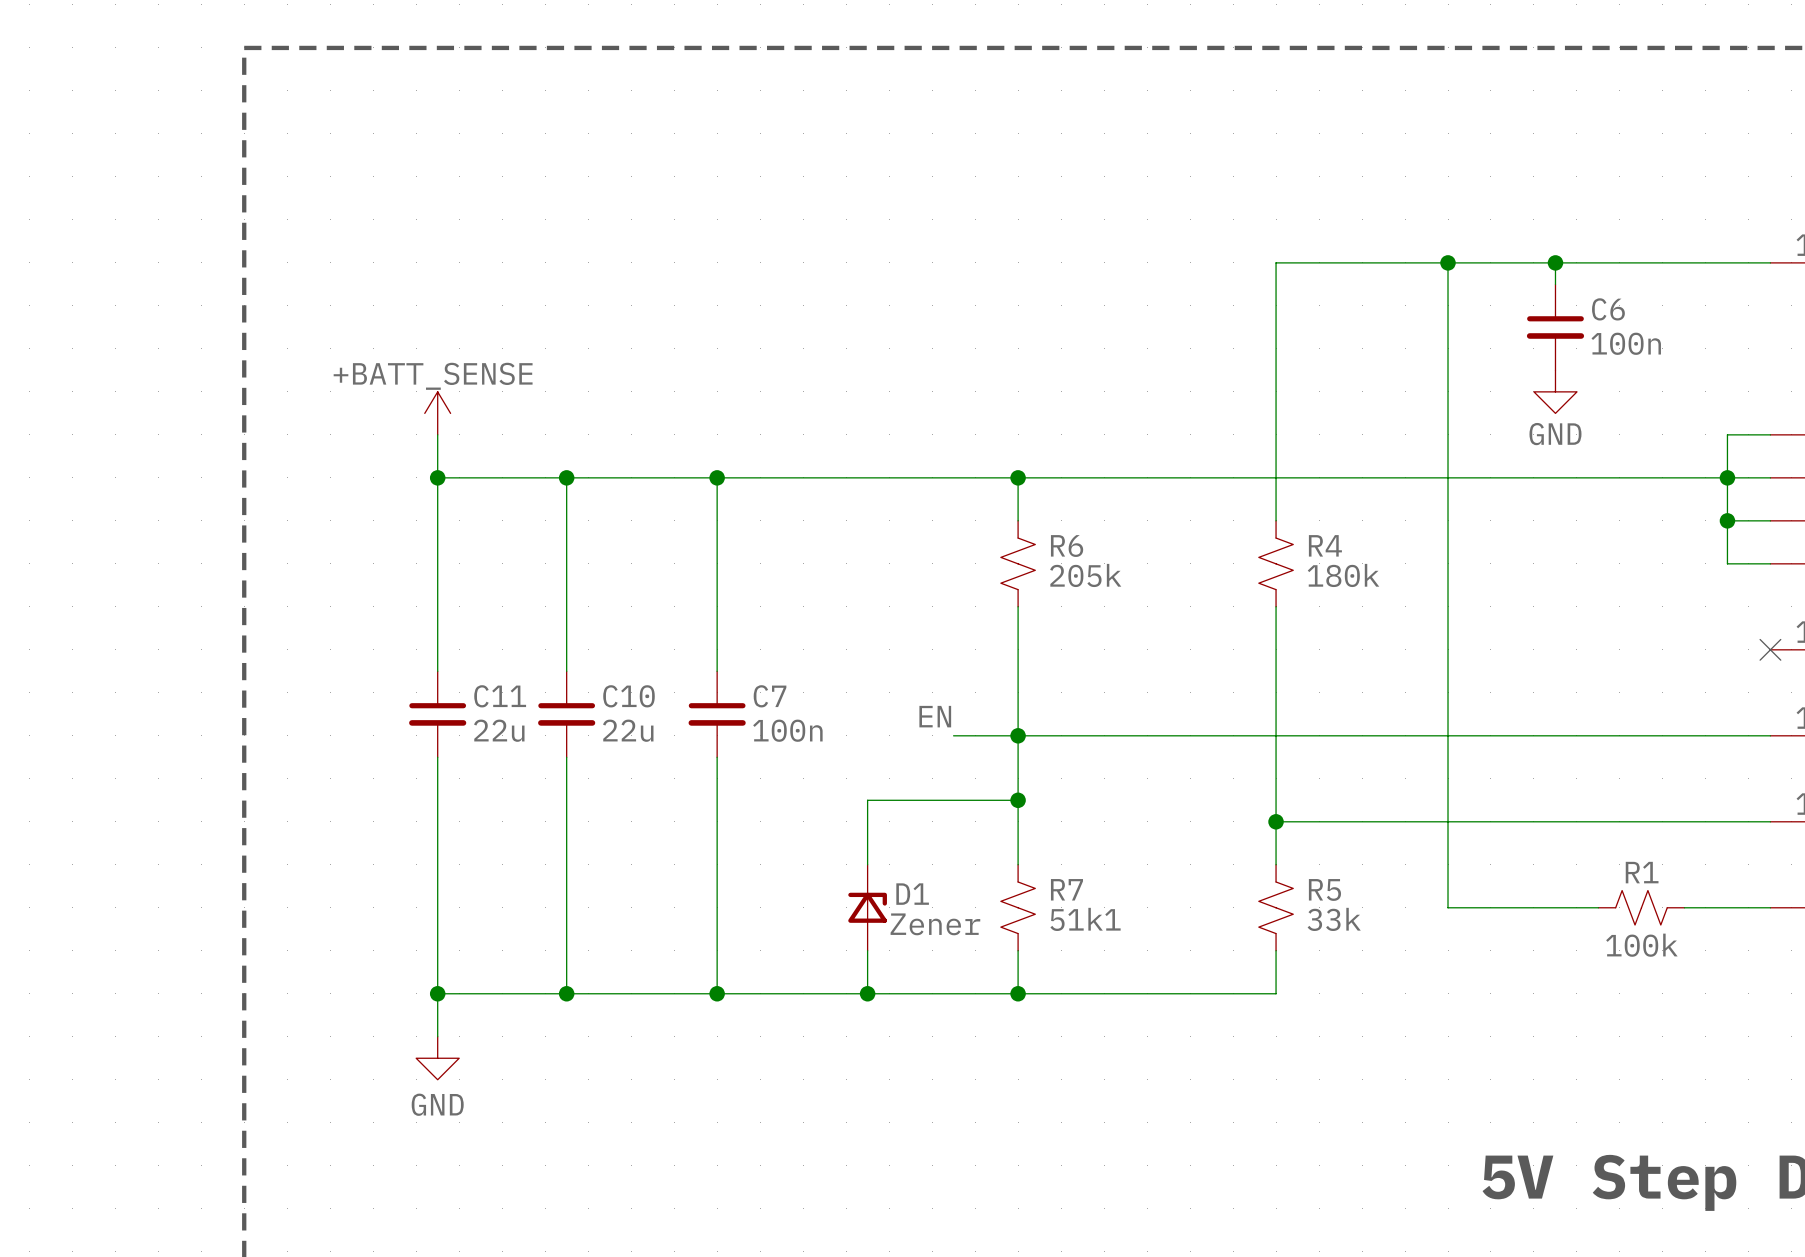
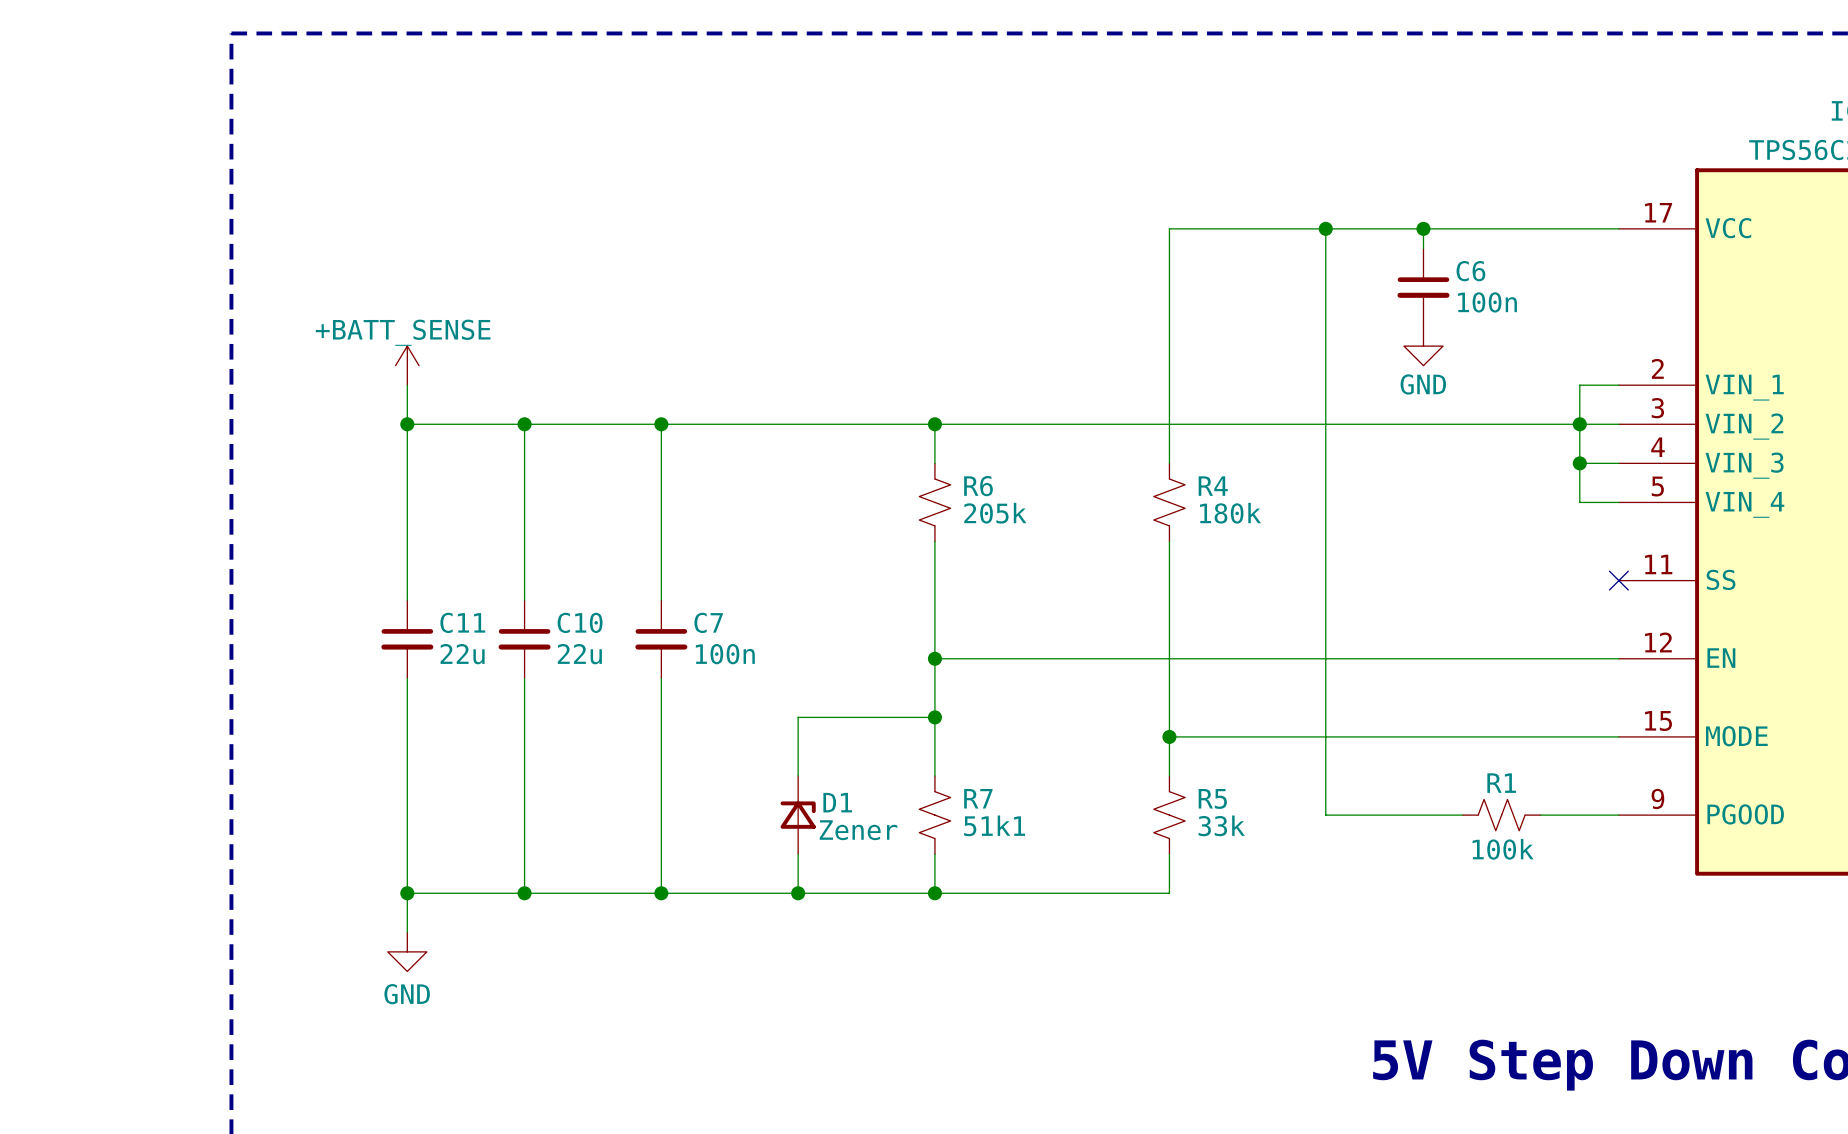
label: EN (935, 716) -> none
wire: (953, 735) (1018, 735) -> none

